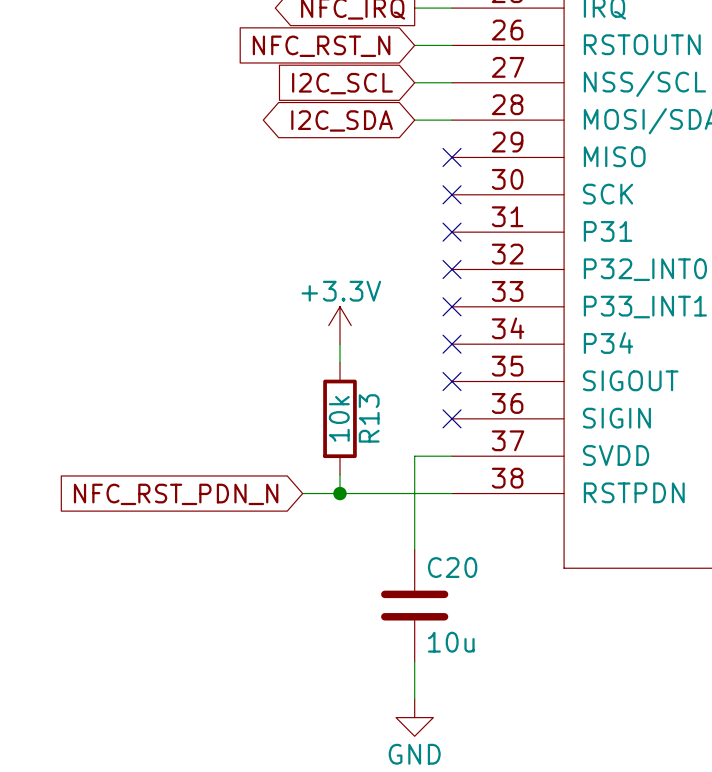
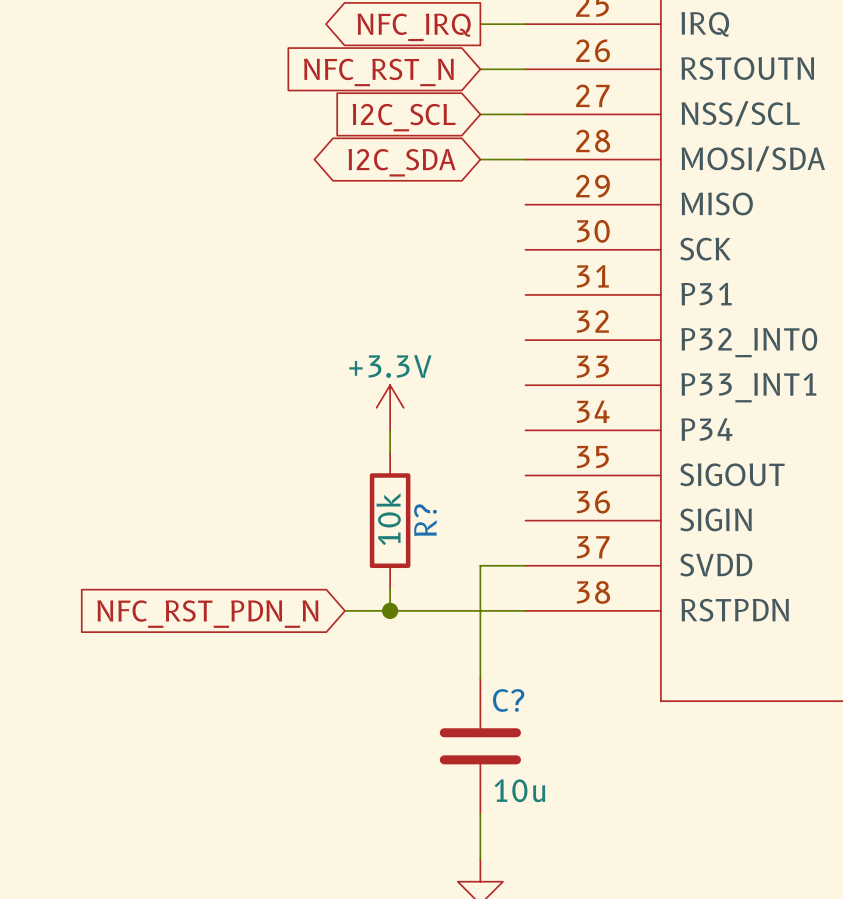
no-connect mark: (452, 157) -> none
no-connect mark: (452, 194) -> none
no-connect mark: (452, 232) -> none
no-connect mark: (452, 269) -> none
no-connect mark: (452, 306) -> none
no-connect mark: (452, 344) -> none
no-connect mark: (452, 381) -> none
R13 name: R13 (369, 418) -> R? (425, 520)
no-connect mark: (452, 418) -> none
C20 name: C20 (452, 567) -> C? (508, 700)

